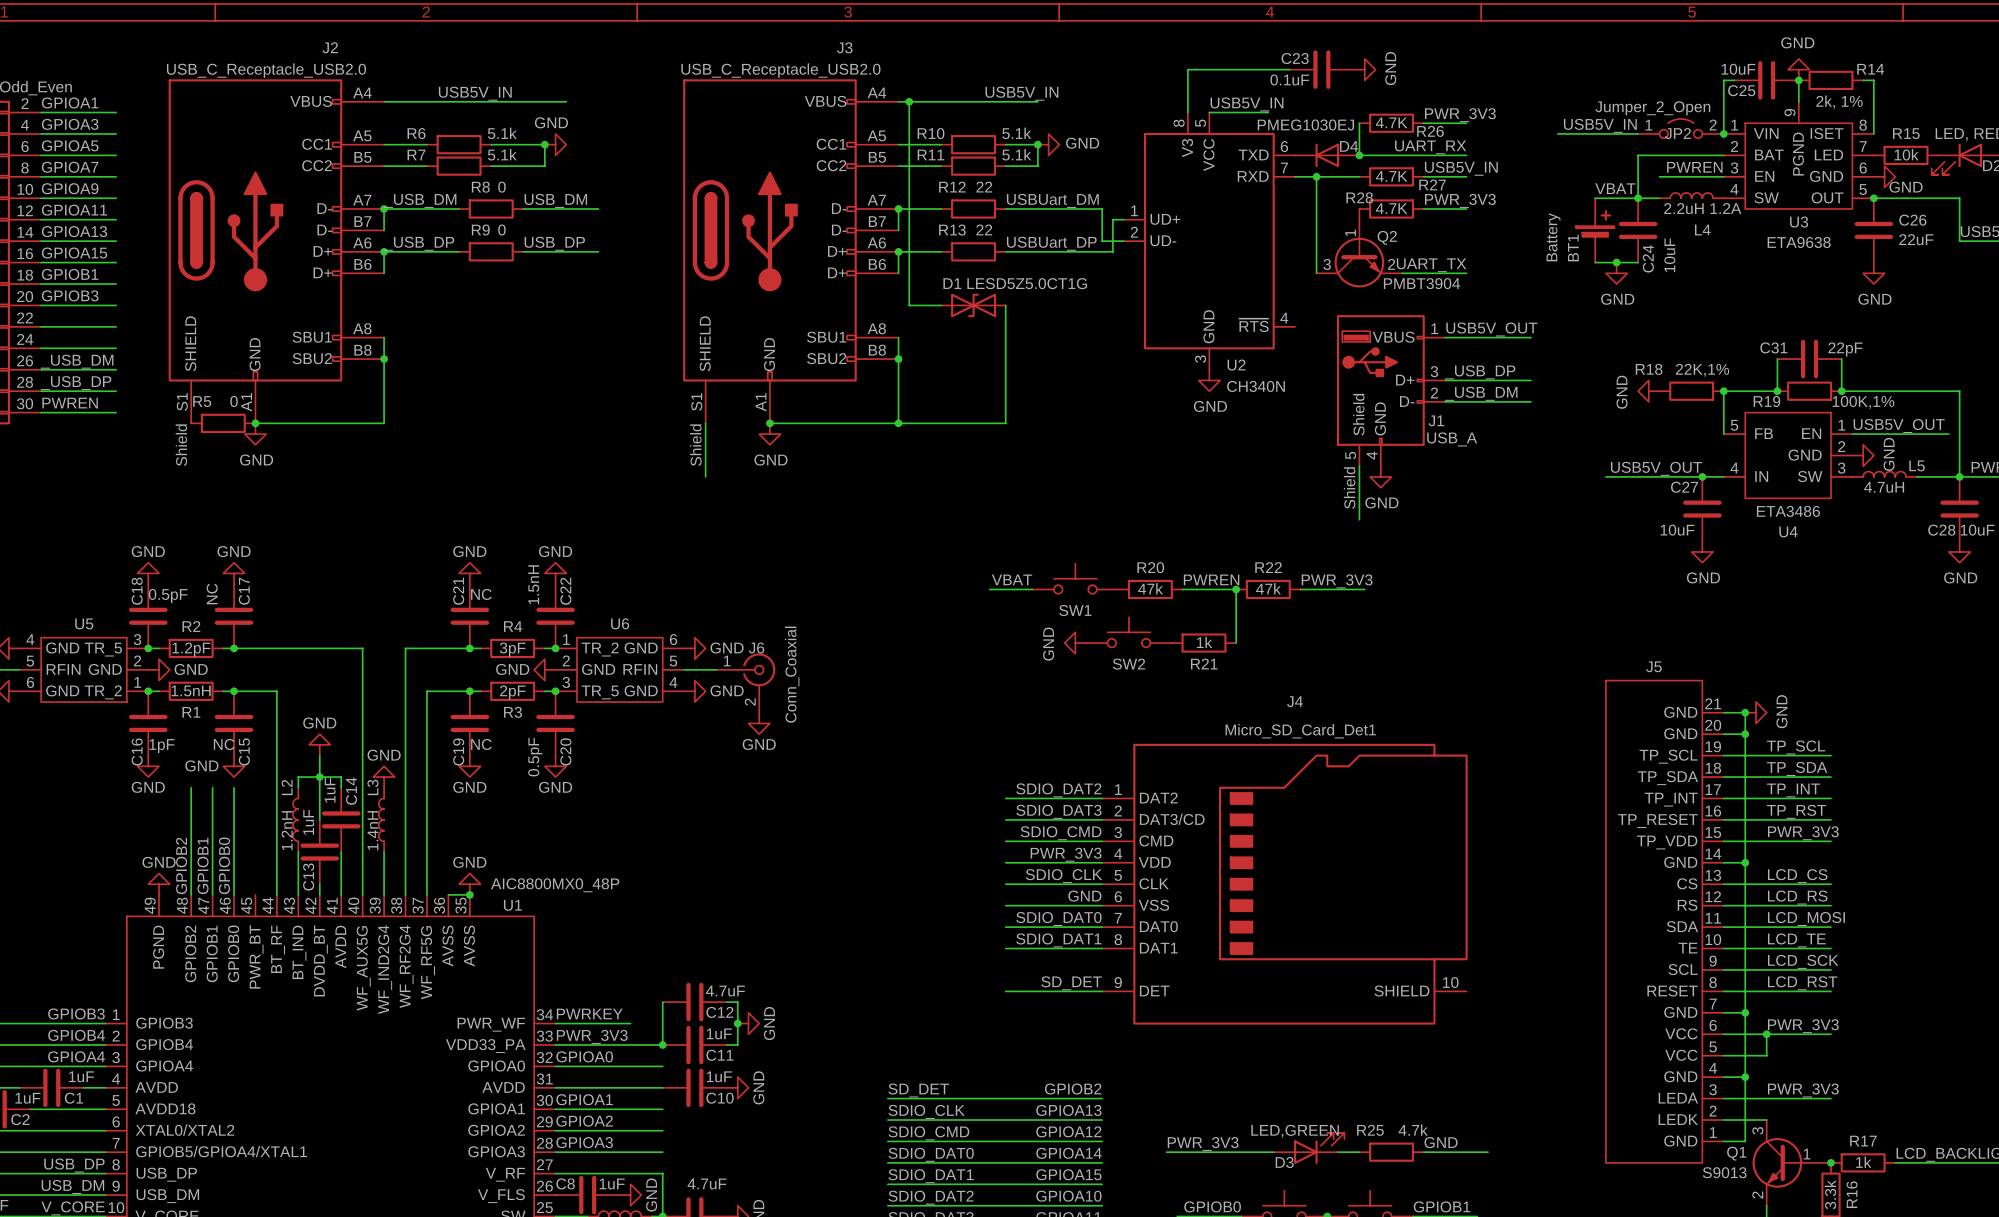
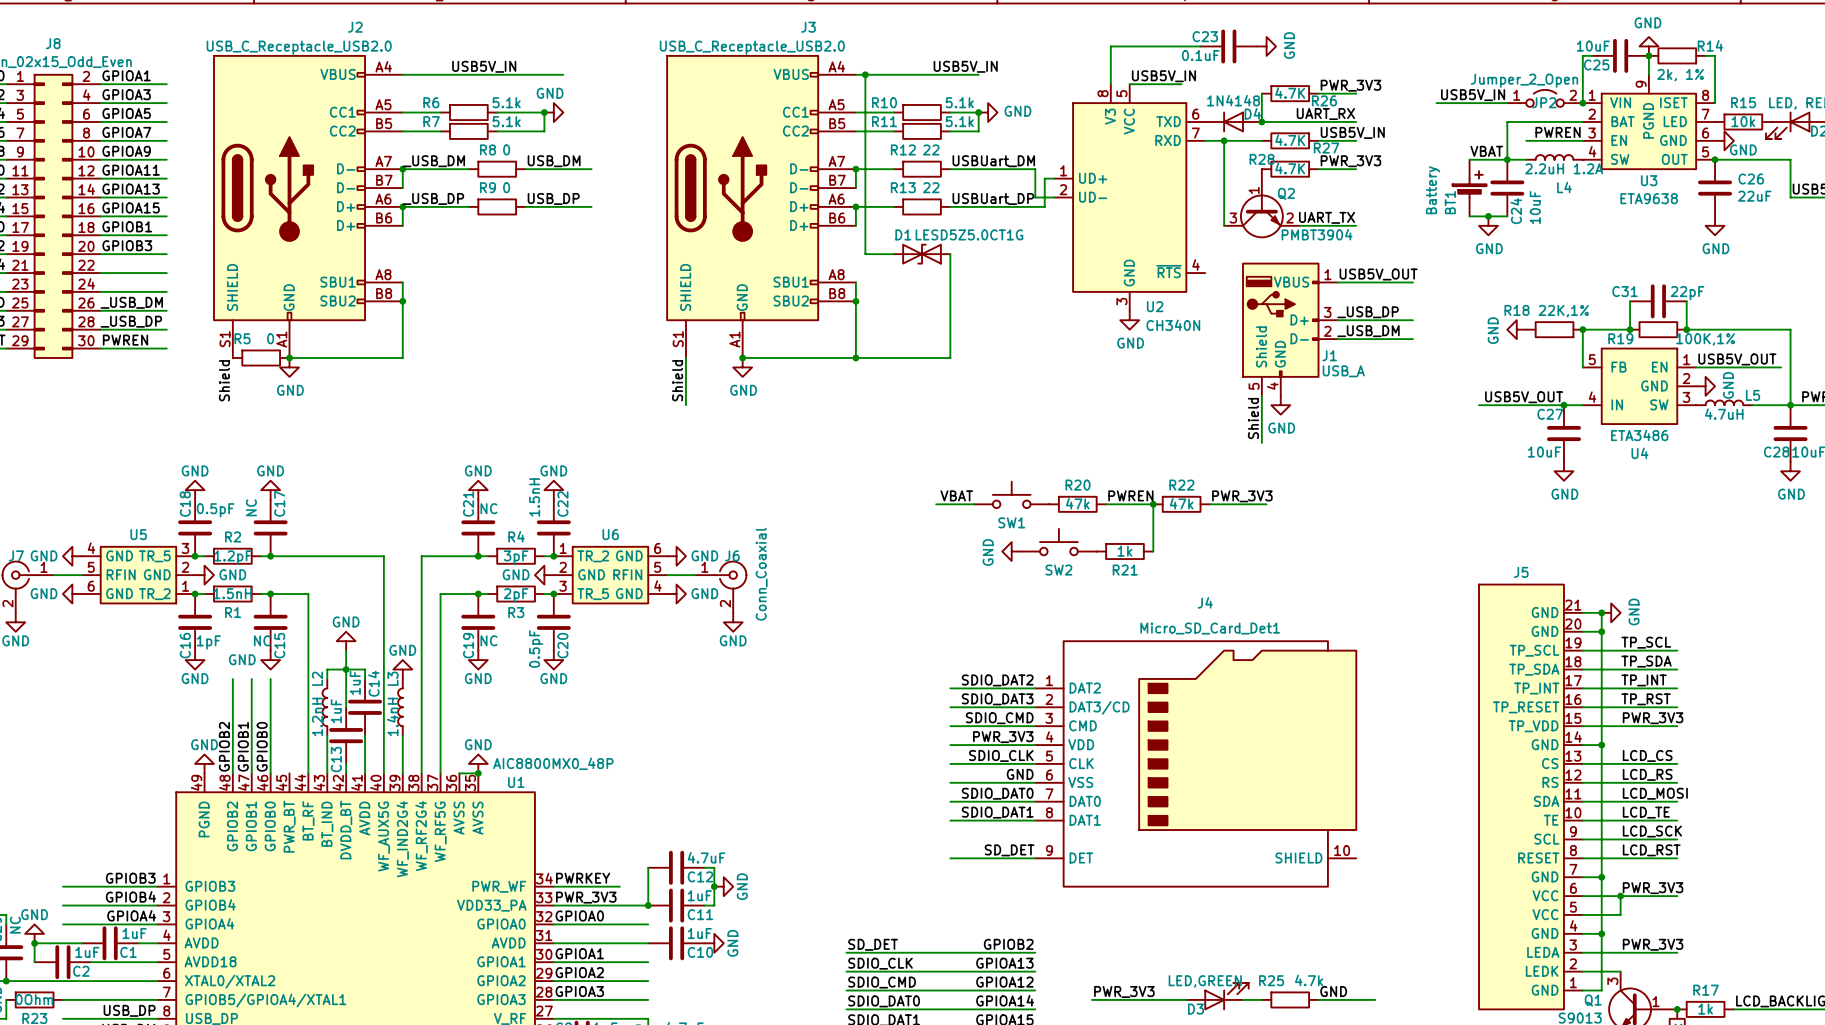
D4 value: PMEG1030EJ (1305, 124) -> 1N4148 (1233, 100)

